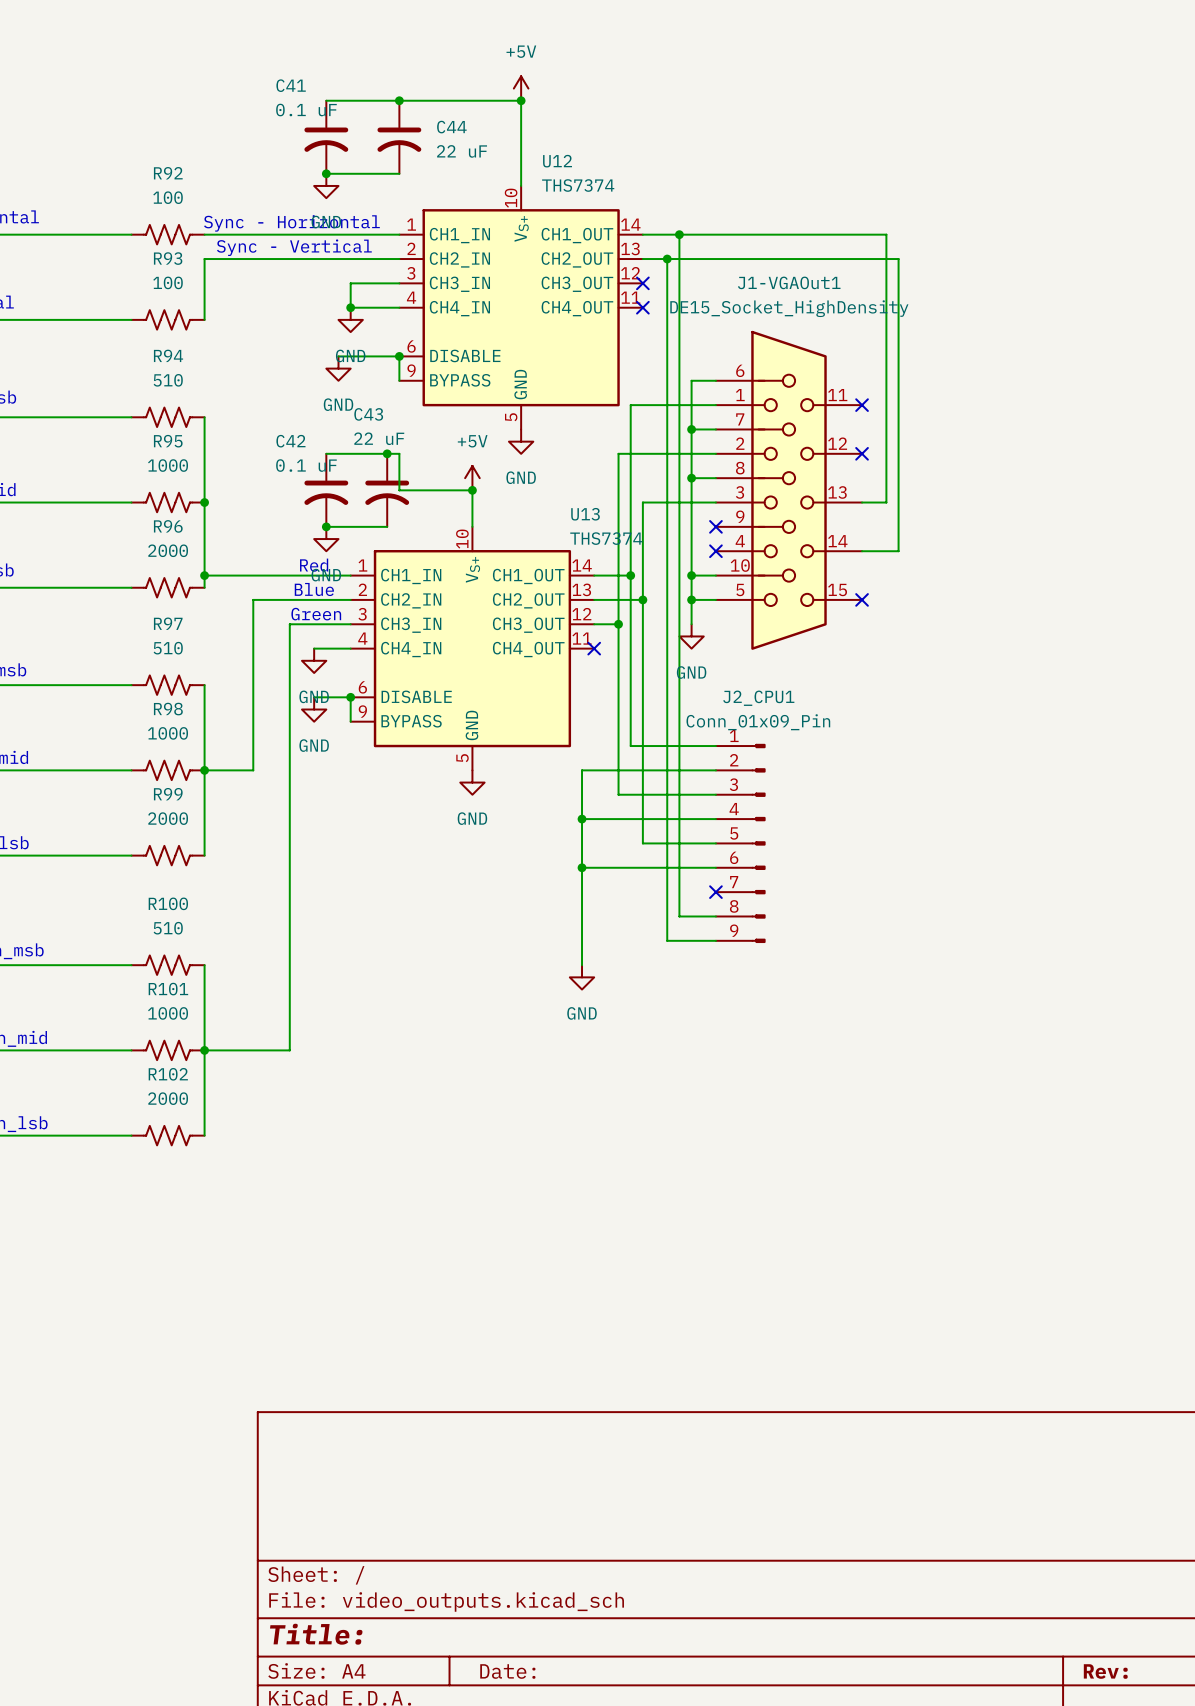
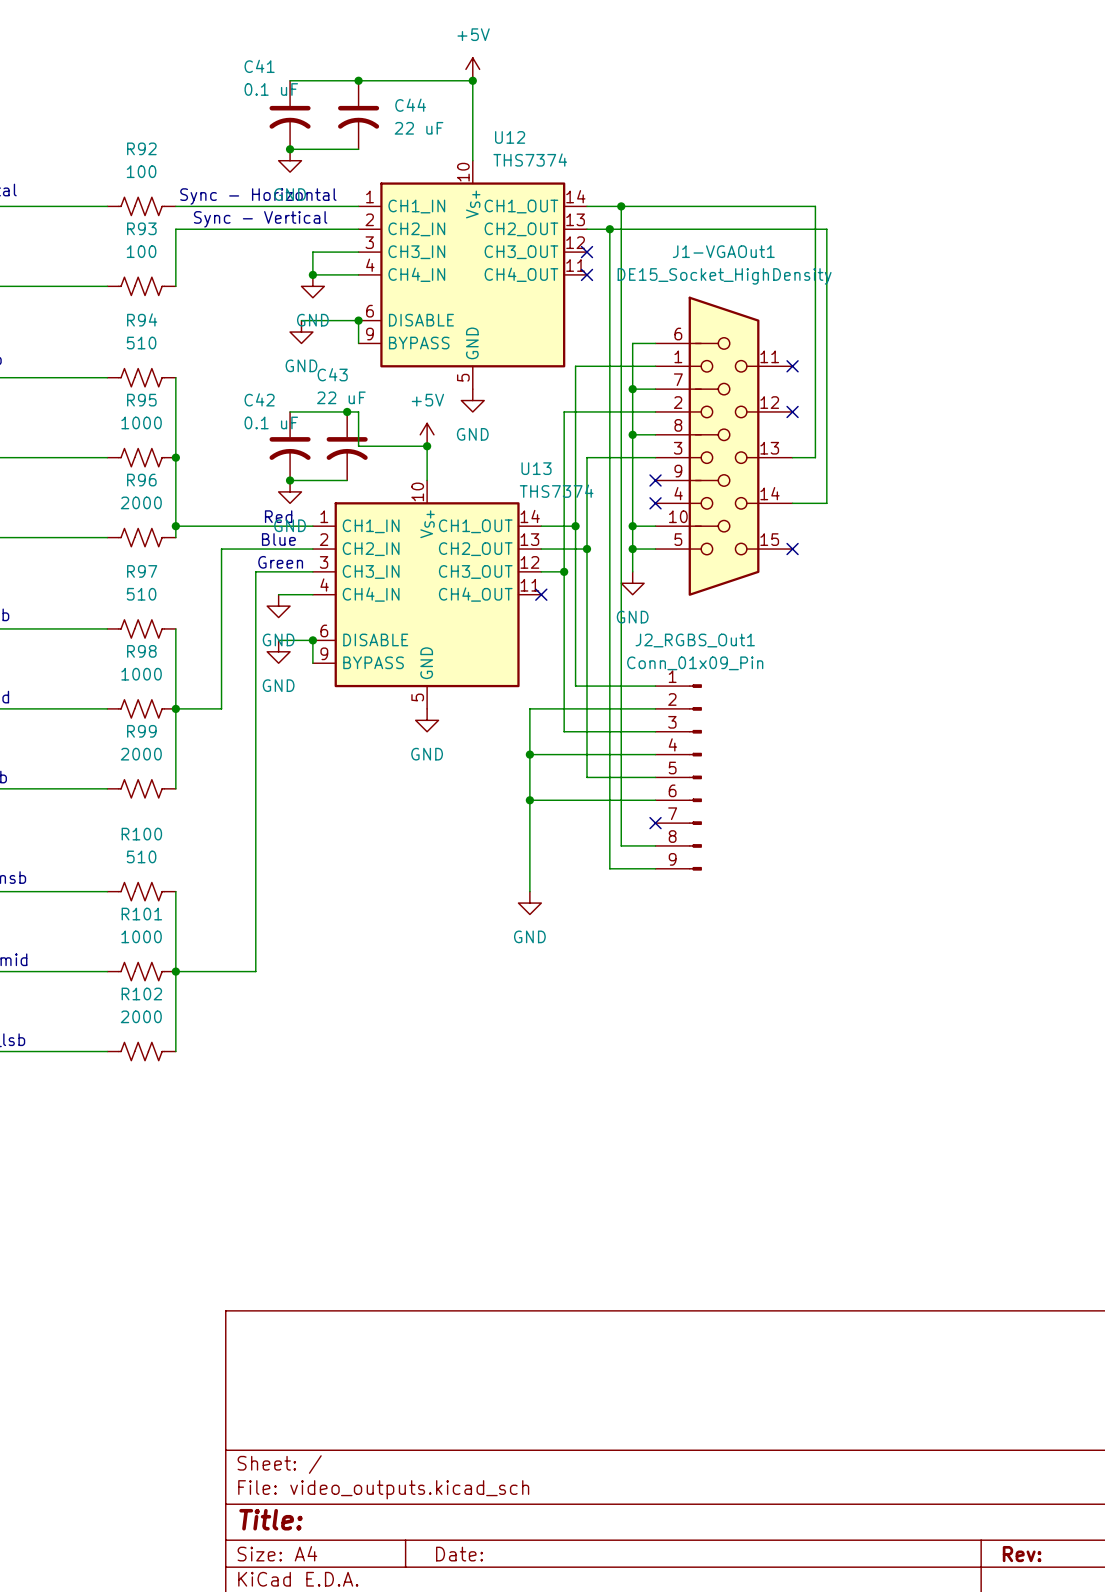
J2_CPU1 name: J2_CPU1 (758, 698) -> J2_RGBS_Out1 (695, 640)

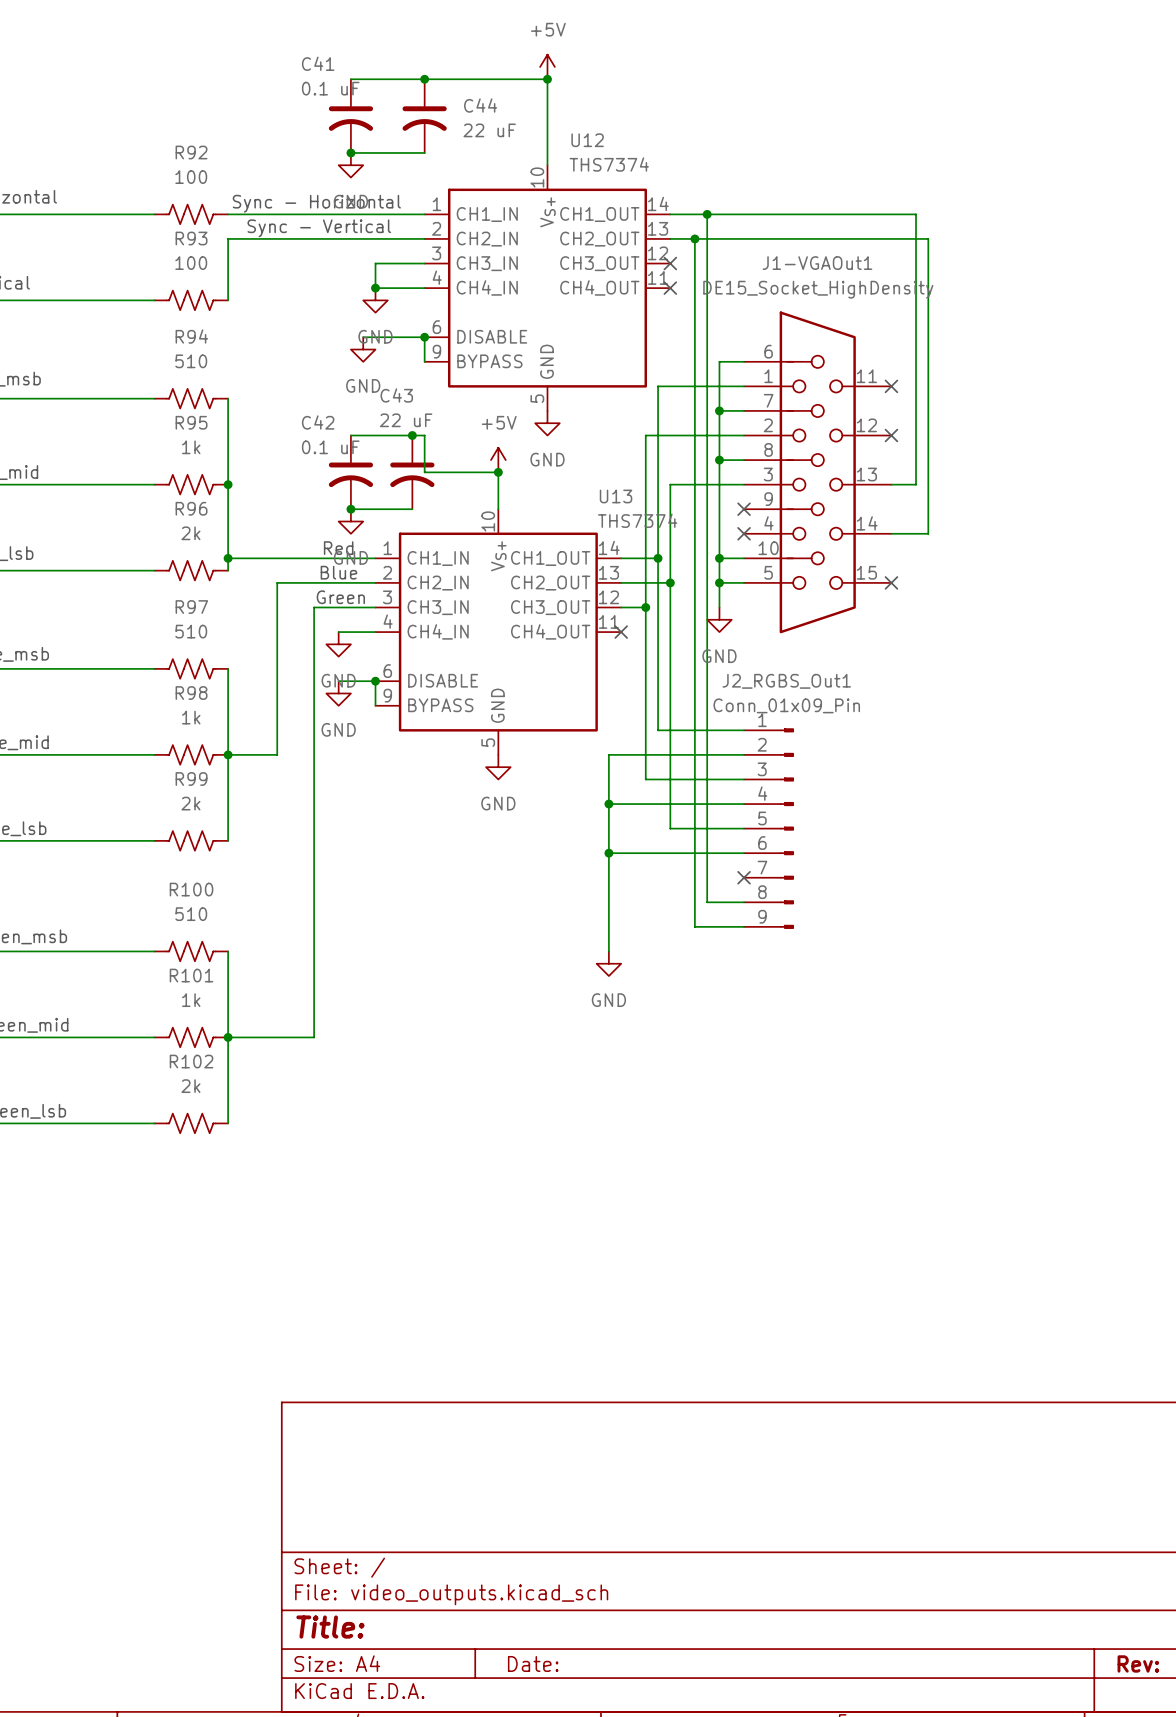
R95 value: 1000 (141, 422) -> 1k (191, 447)
R96 value: 2000 (141, 502) -> 2k (190, 533)
R98 value: 1000 (141, 674) -> 1k (191, 717)
R99 value: 2000 (141, 754) -> 2k (190, 803)
R101 value: 1000 (141, 936) -> 1k (191, 1000)
R102 value: 2000 (141, 1016) -> 2k (190, 1086)

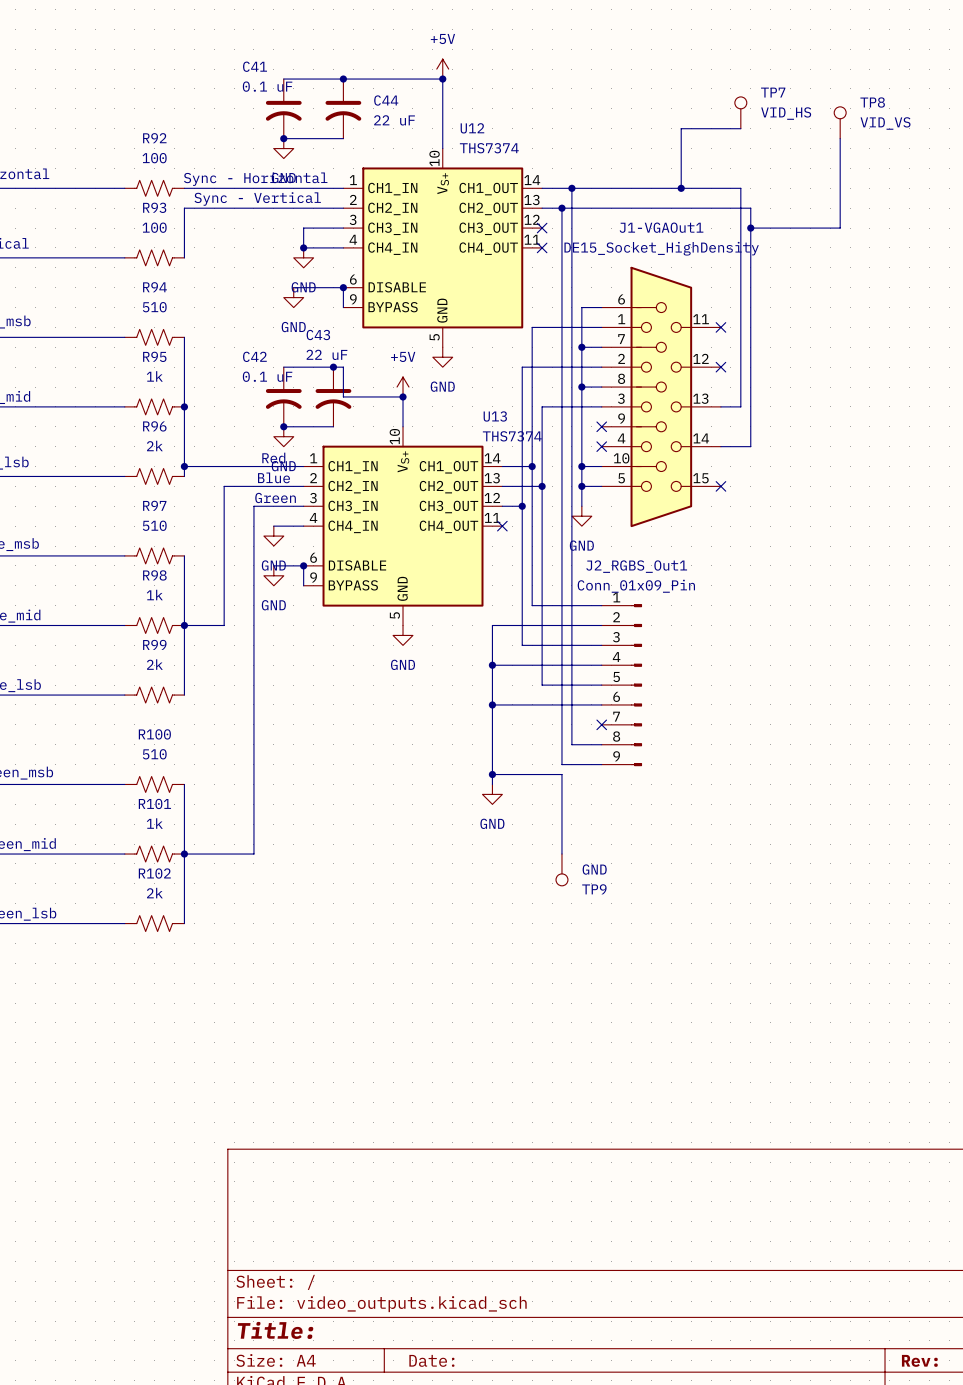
TP7: none -> VID_HS (740, 112)
TP8: none -> VID_VS (840, 122)
wire: none -> (740, 128) (681, 128) (681, 188)
wire: none -> (840, 138) (840, 228) (750, 228)
junction: none -> (681, 188)
junction: none -> (750, 228)
wire: none -> (492, 774) (561, 774) (561, 854)
junction: none -> (492, 774)
TP9: none -> GND (561, 869)

